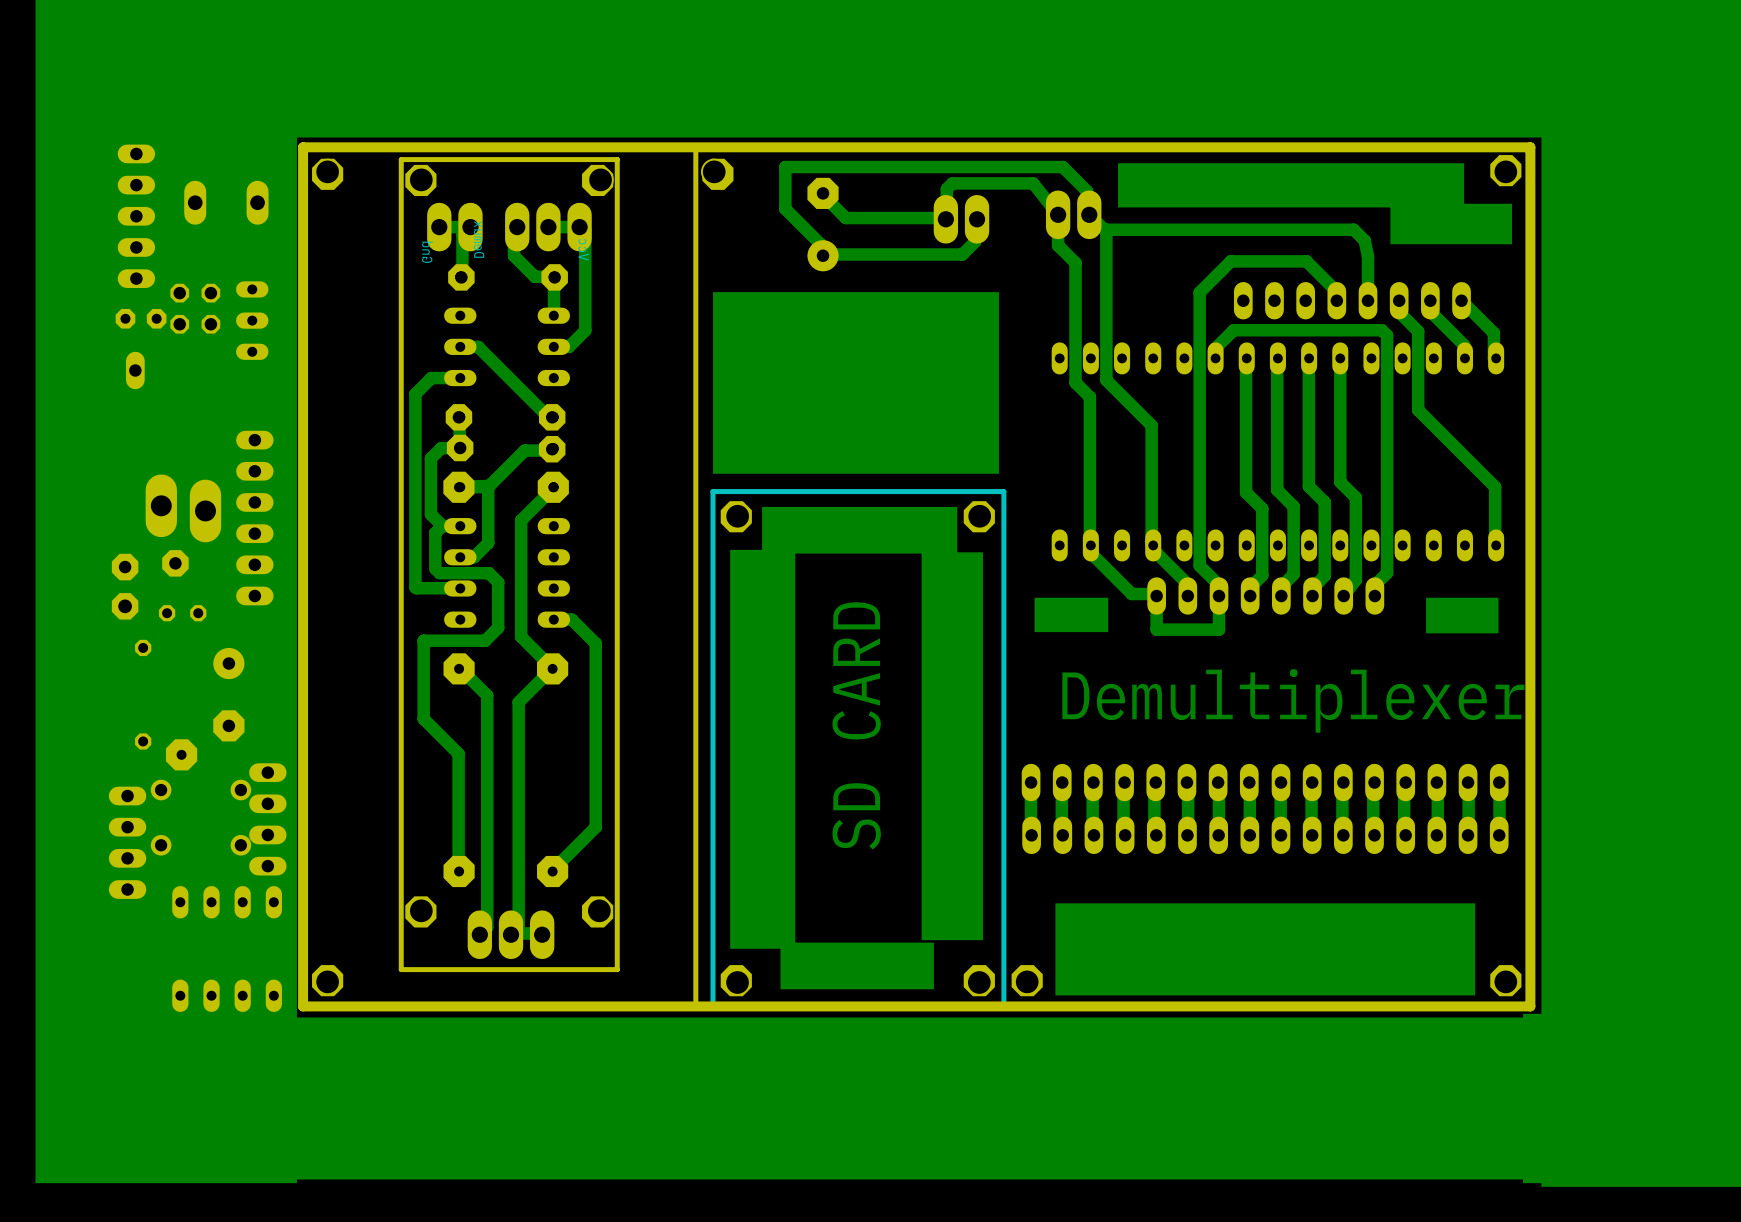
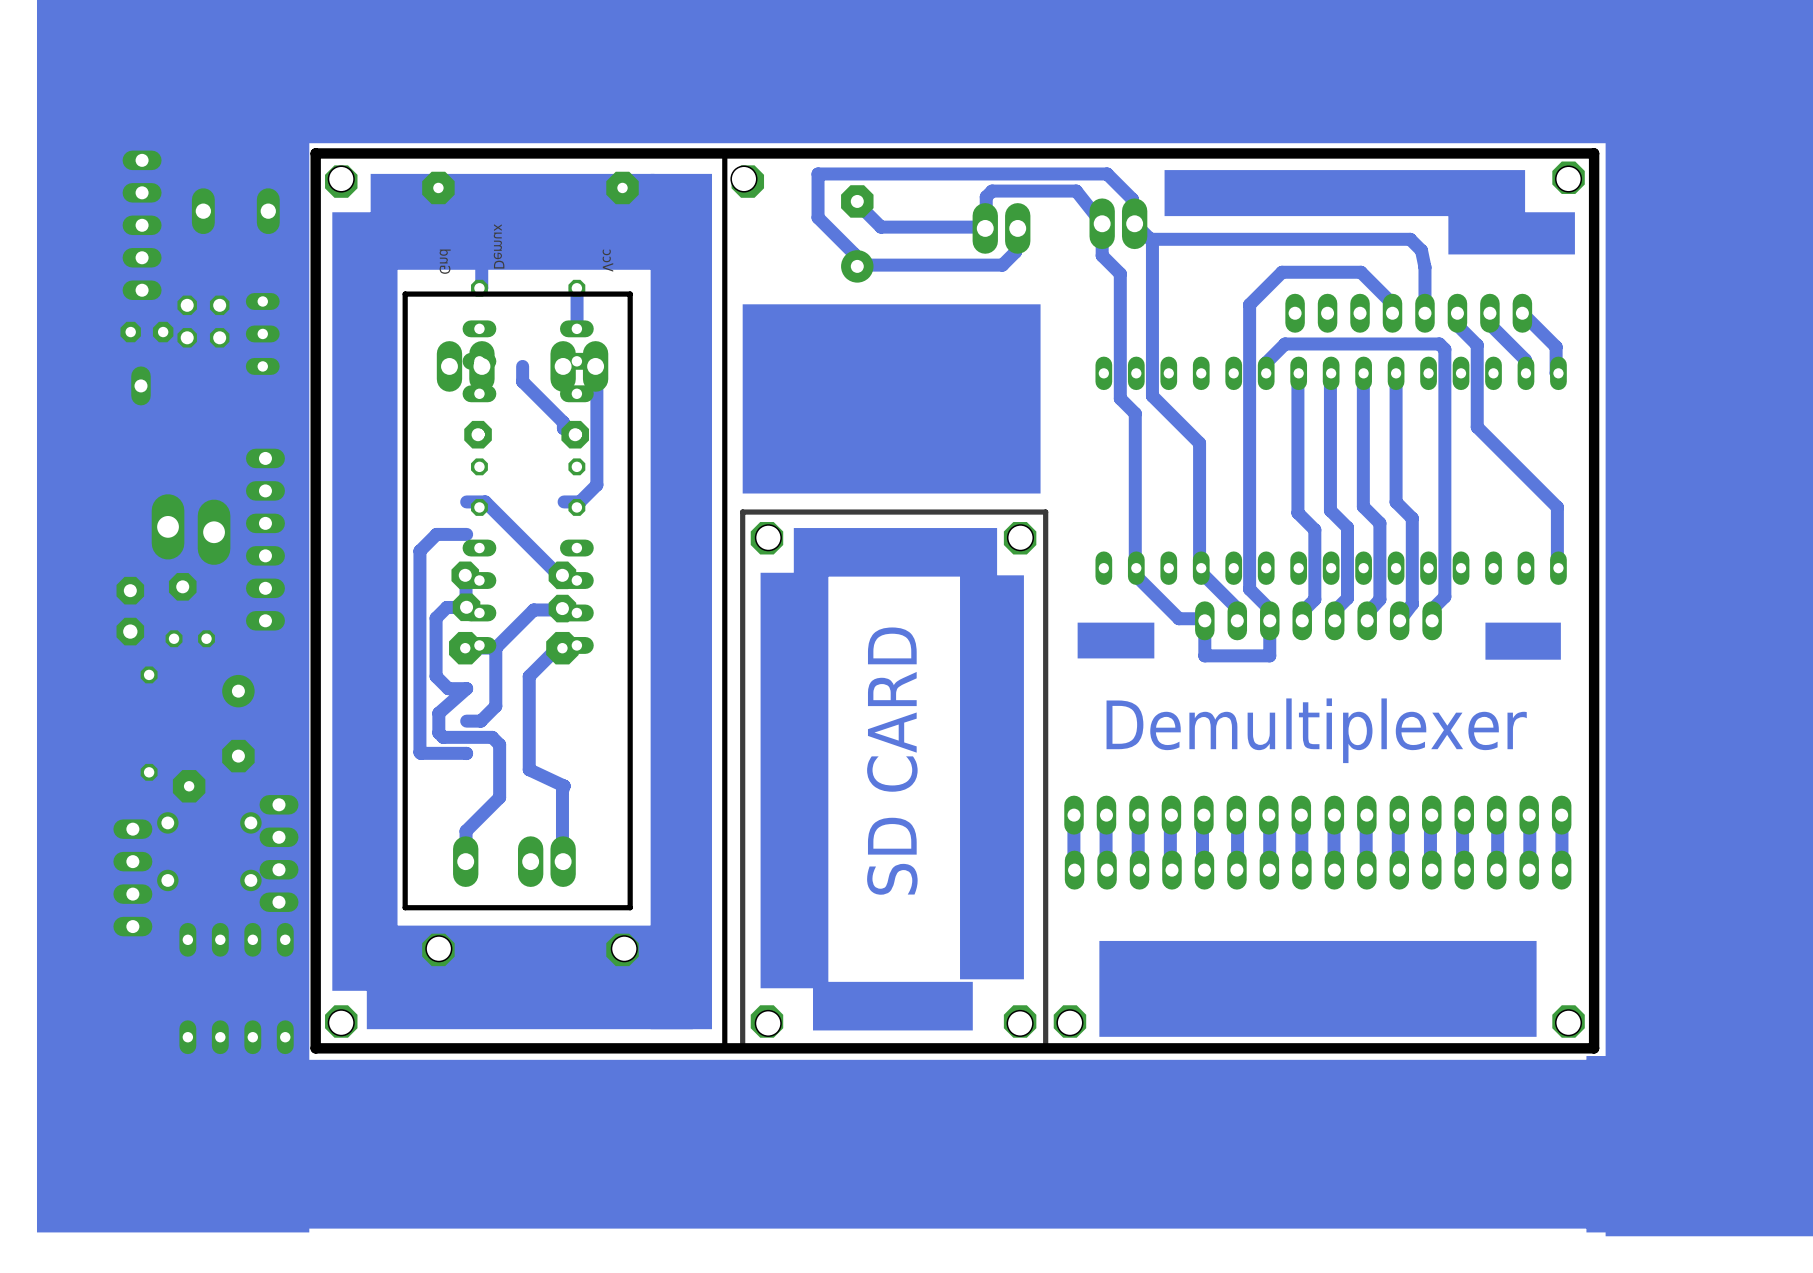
board edge: (617, 159) (401, 159) (401, 969) (617, 969) (617, 159) -> (630, 294) (630, 907) (405, 907) (405, 294) (630, 294)
drawing: none -> [332, 173, 713, 1030]
hole: (421, 179) -> none
hole: (600, 179) -> none
part: (439, 227) -> none
part: (470, 227) -> none
part: (517, 227) -> none
part: (548, 227) -> none
part: (579, 227) -> none
track: (582, 227) (585, 229) (585, 330) (569, 346) (553, 346) -> none
track: (514, 229) (511, 229) (517, 227) (514, 230) (514, 255) (534, 276) (553, 276) -> none
part: (461, 277) -> none
part: (554, 277) -> none
track: (460, 346) (478, 346) (548, 416) (553, 417) -> (466, 501) (485, 501) (558, 574) (564, 575)
part: none -> (449, 366)
part: none -> (481, 366)
track: none -> (522, 366) (522, 381) (563, 422) (564, 428)
part: none -> (563, 366)
track: none -> (595, 366) (596, 484) (579, 501) (564, 501)
part: none -> (595, 366)
track: (460, 378) (431, 378) (415, 394) (415, 587) (460, 588) -> (466, 534) (436, 534) (419, 551) (419, 752) (466, 753)
track: (460, 417) (460, 448) (441, 448) (430, 458) (430, 514) (442, 526) -> none
part: (460, 448) -> none
track: (553, 448) (552, 450) (524, 450) (489, 485) (460, 487) (488, 487) (488, 542) (473, 557) (460, 557) -> (564, 607) (562, 609) (533, 609) (497, 646) (466, 648) (495, 648) (495, 706) (480, 721) (466, 721)
part: (552, 449) -> none
part: (458, 487) -> none
track: (553, 487) (551, 487) (551, 490) (521, 520) (521, 636) (552, 668) (518, 702) (518, 933) (511, 934) -> none
part: (553, 487) -> none
track: (442, 526) (435, 532) (435, 569) (439, 573) (489, 573) (498, 582) (498, 627) (485, 640) (423, 640) (423, 718) (458, 753) (459, 871) -> none
part: none -> (465, 575)
track: none -> (466, 575) (466, 607) (446, 607) (436, 618) (436, 676) (448, 688) (466, 688) (438, 713) (438, 732) (443, 737) (492, 737) (499, 744) (499, 797) (466, 831) (465, 861)
part: none -> (562, 575)
part: none -> (466, 607)
part: none -> (562, 608)
track: (553, 619) (571, 619) (595, 643) (595, 827) (552, 871) -> none
part: none -> (465, 648)
part: none -> (562, 648)
track: none -> (564, 648) (557, 648) (529, 676) (529, 769) (564, 786)
track: (459, 668) (487, 695) (487, 927) (479, 934) -> none
part: (459, 668) -> none
part: (552, 668) -> none
track: none -> (564, 786) (562, 791) (563, 861)
part: none -> (465, 861)
part: none -> (530, 861)
part: none -> (563, 861)
part: (459, 871) -> none
part: (552, 871) -> none
part: (479, 934) -> none
part: (511, 934) -> none
part: (542, 934) -> none

